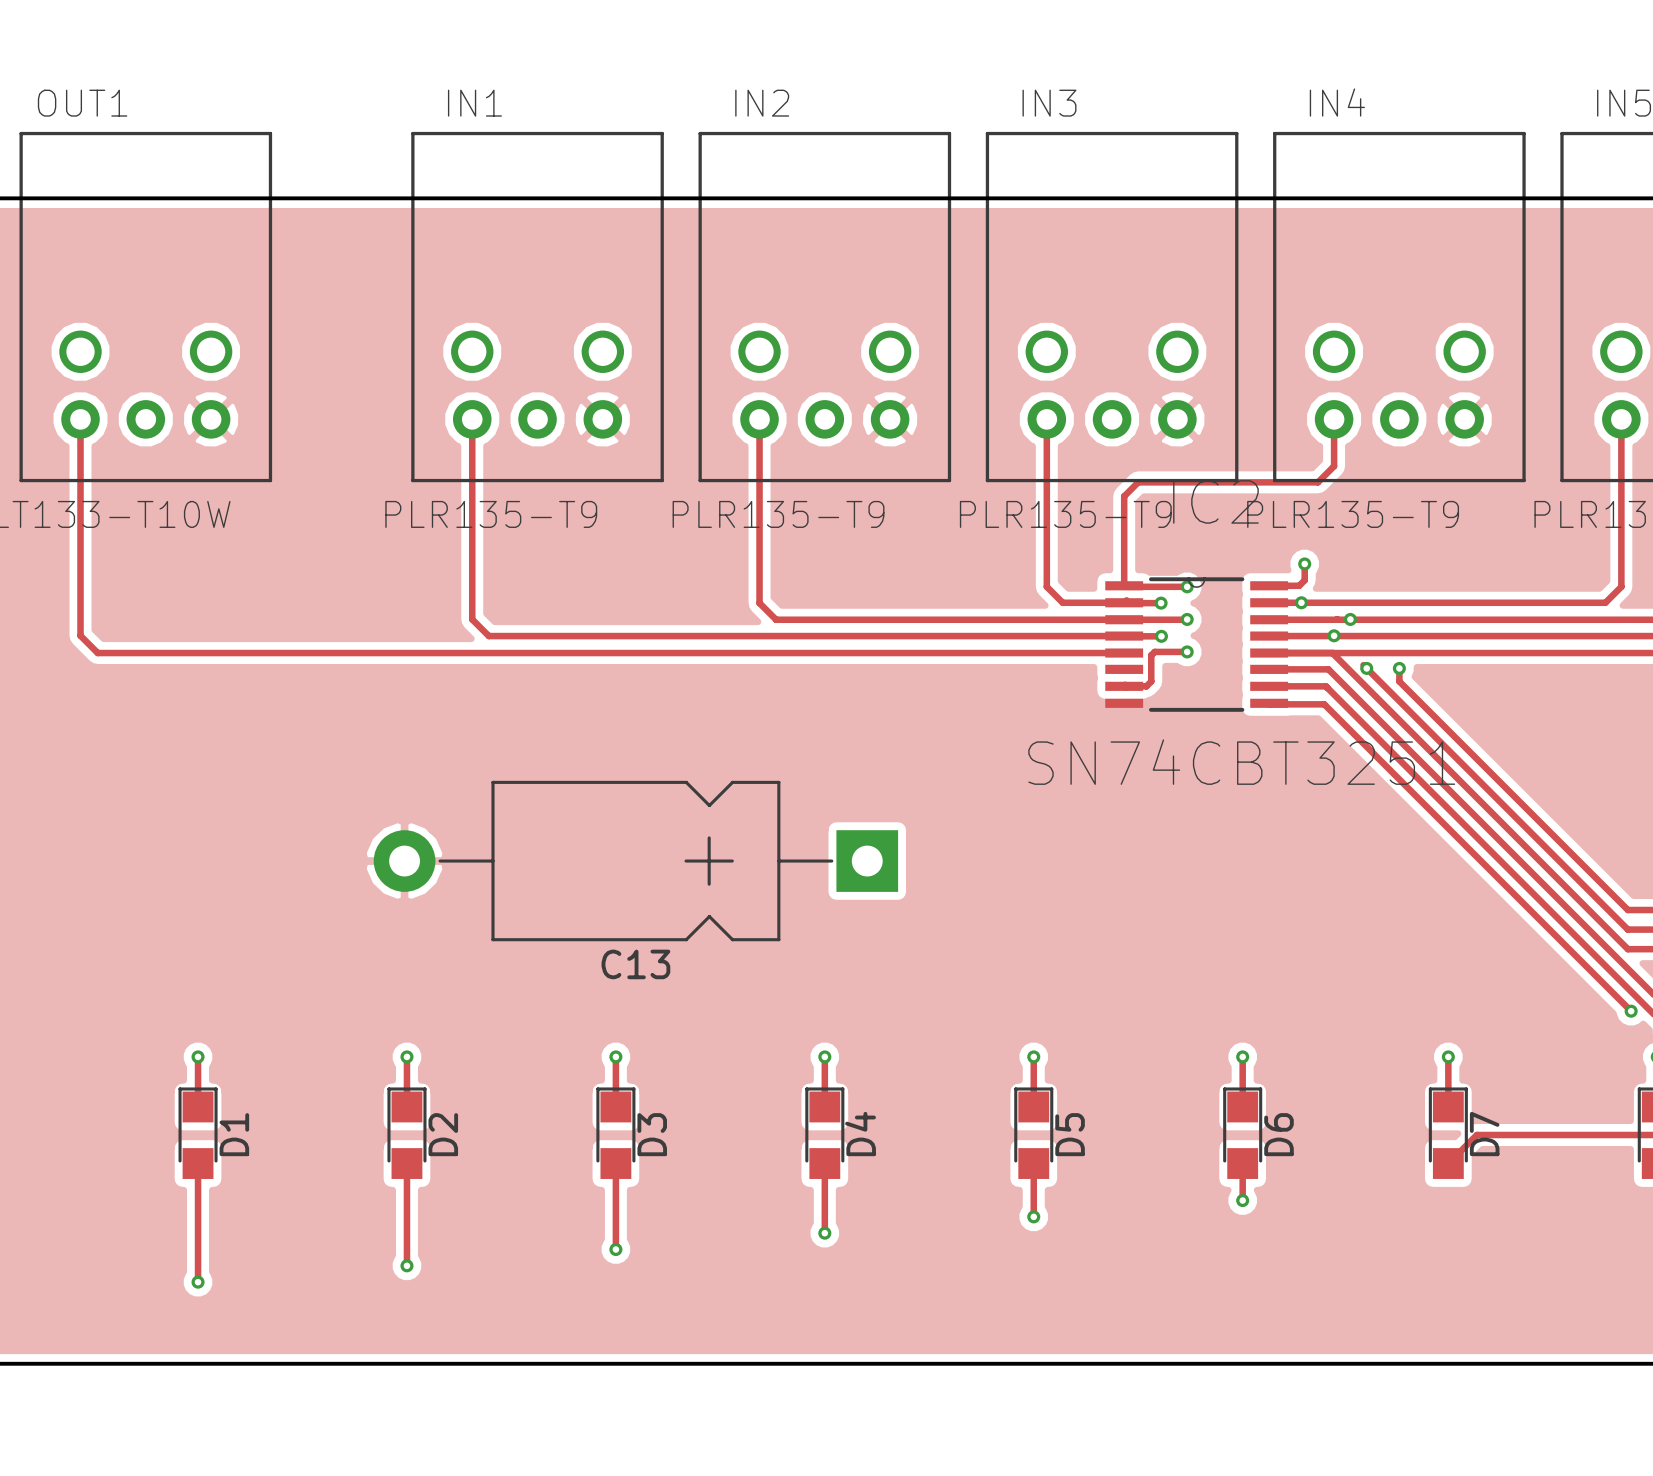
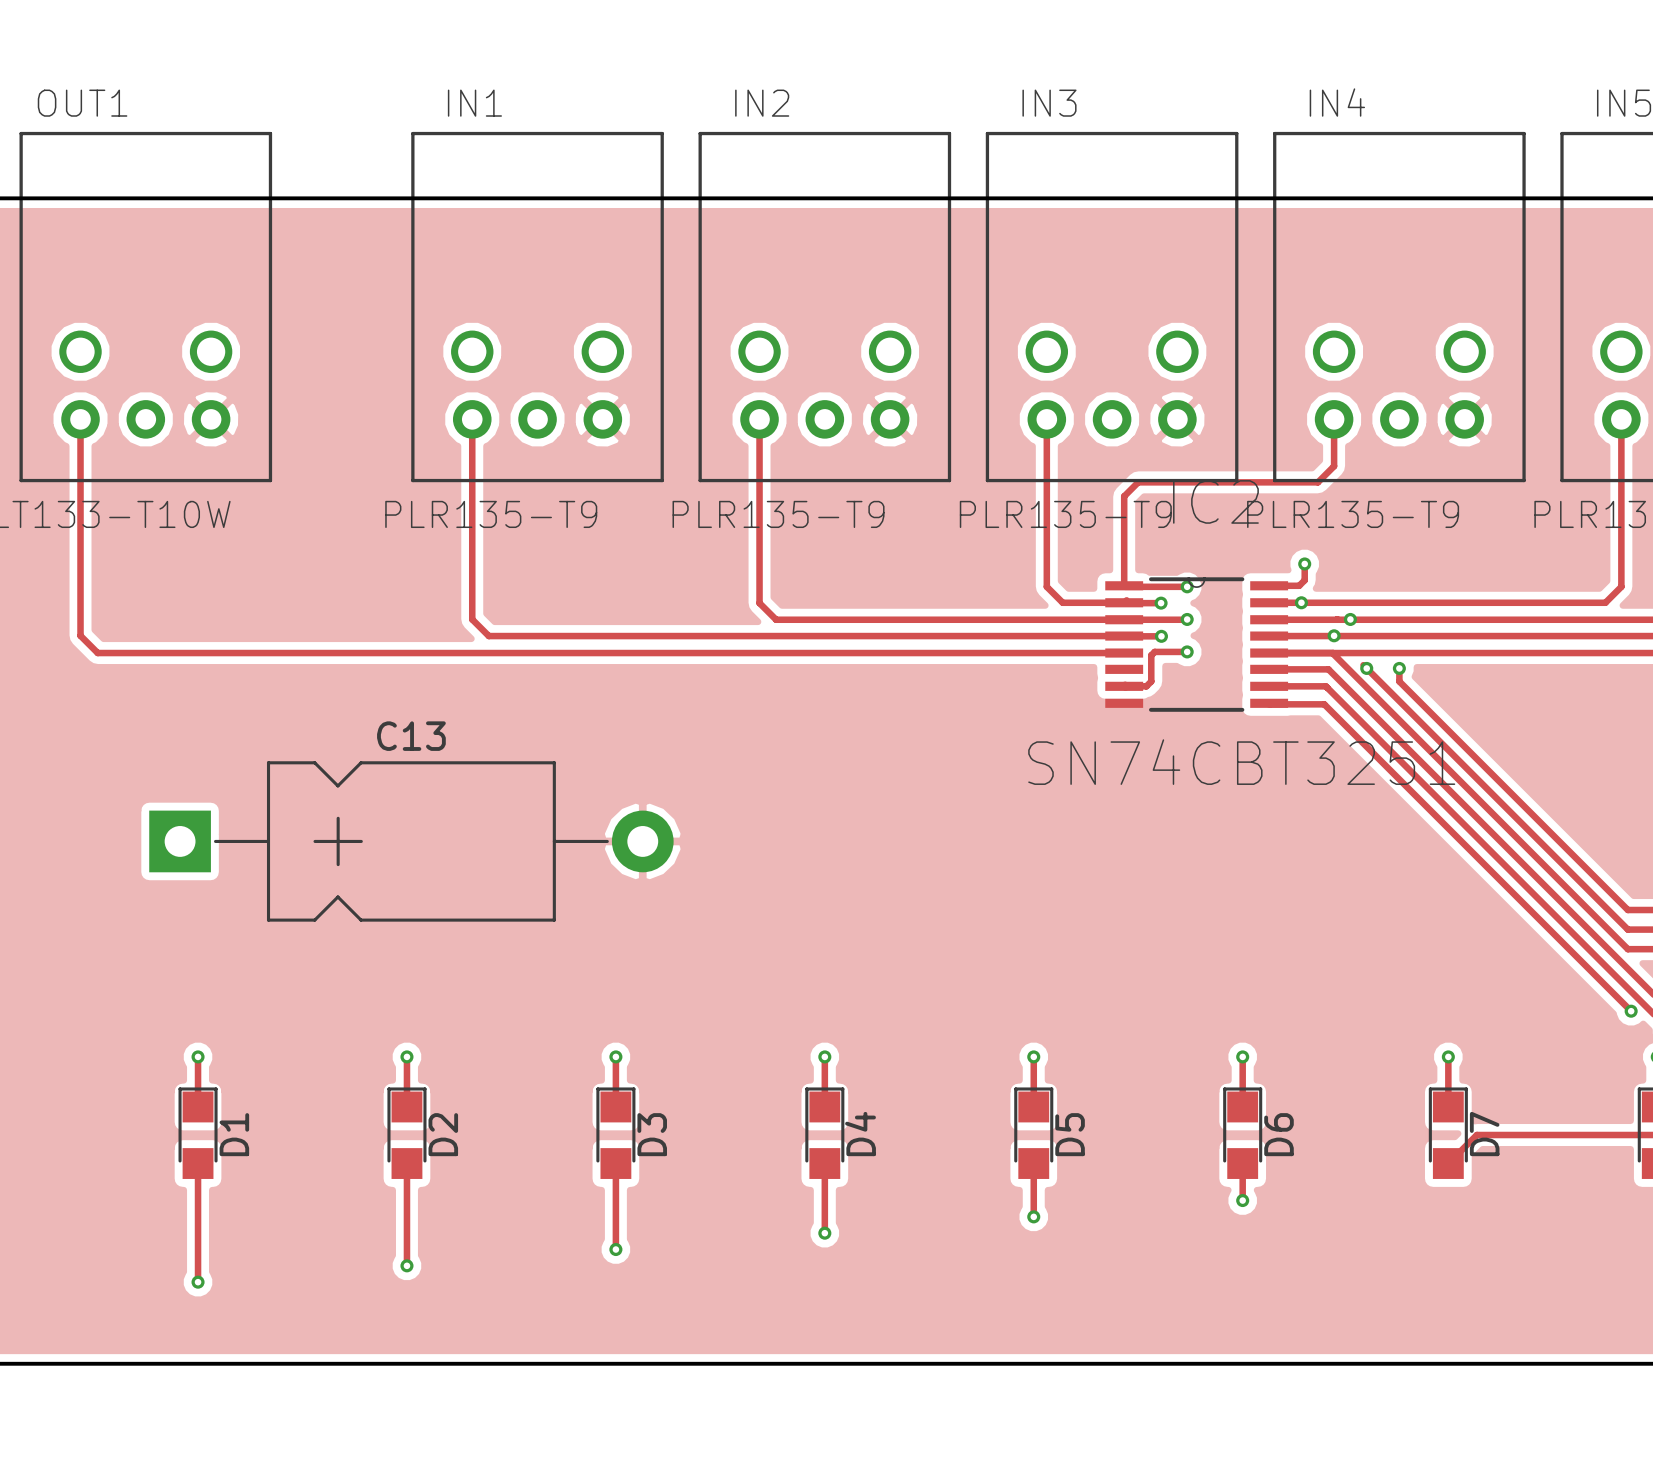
C13 rotation: 0° (635, 861) -> 180° (411, 841)

